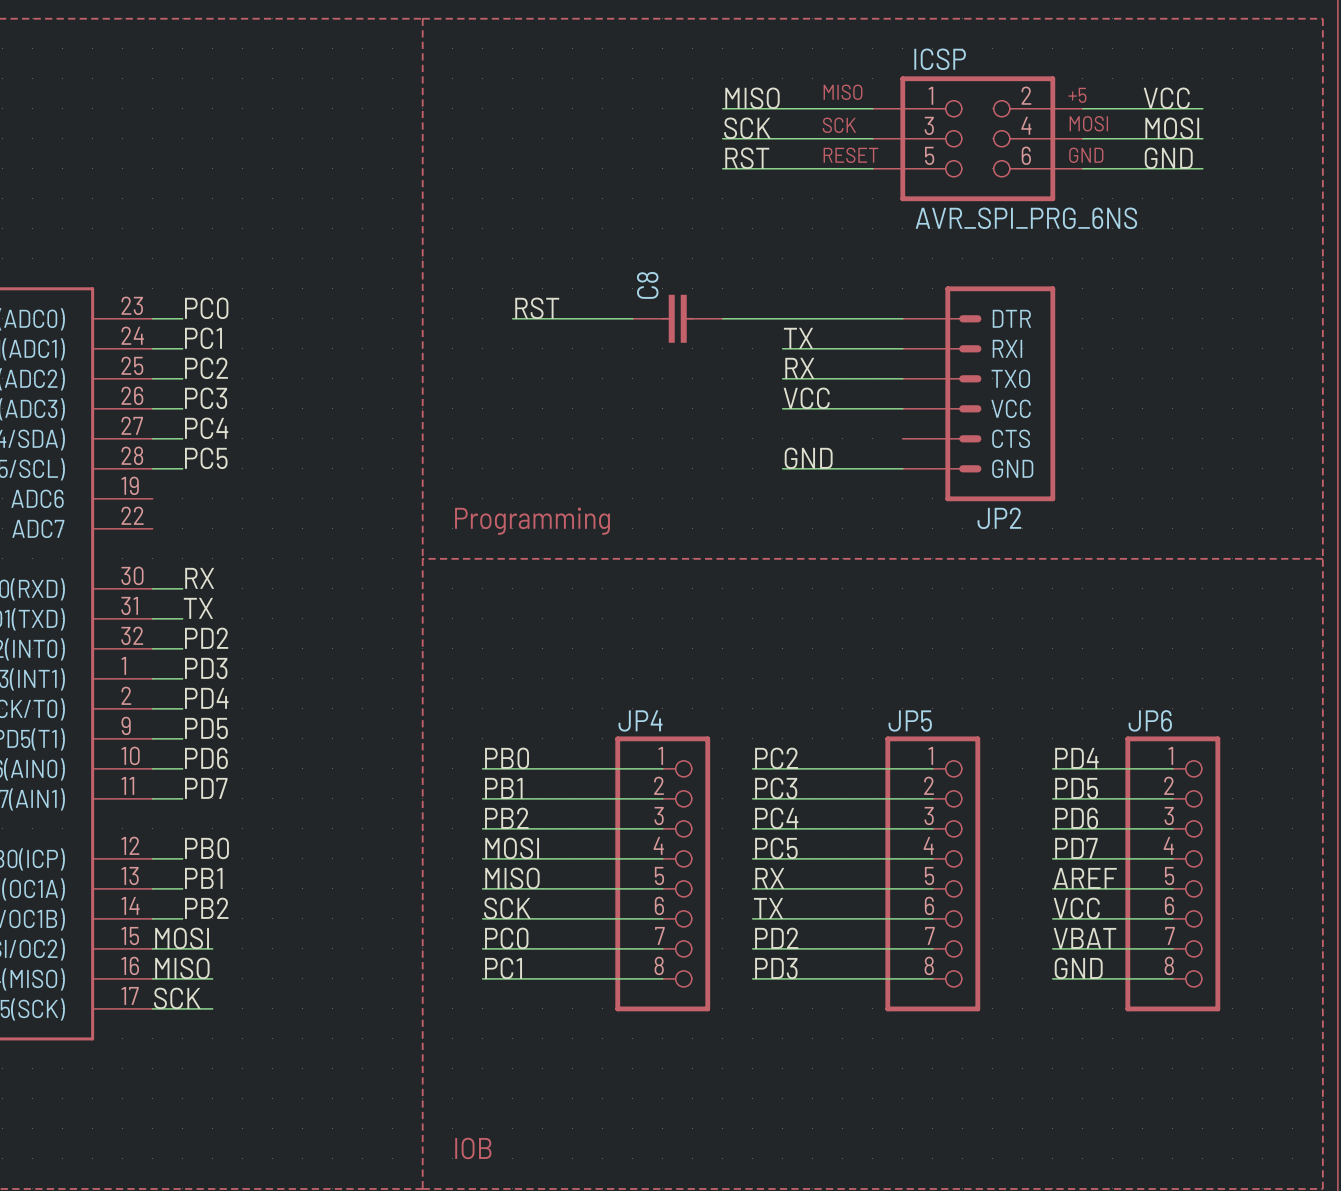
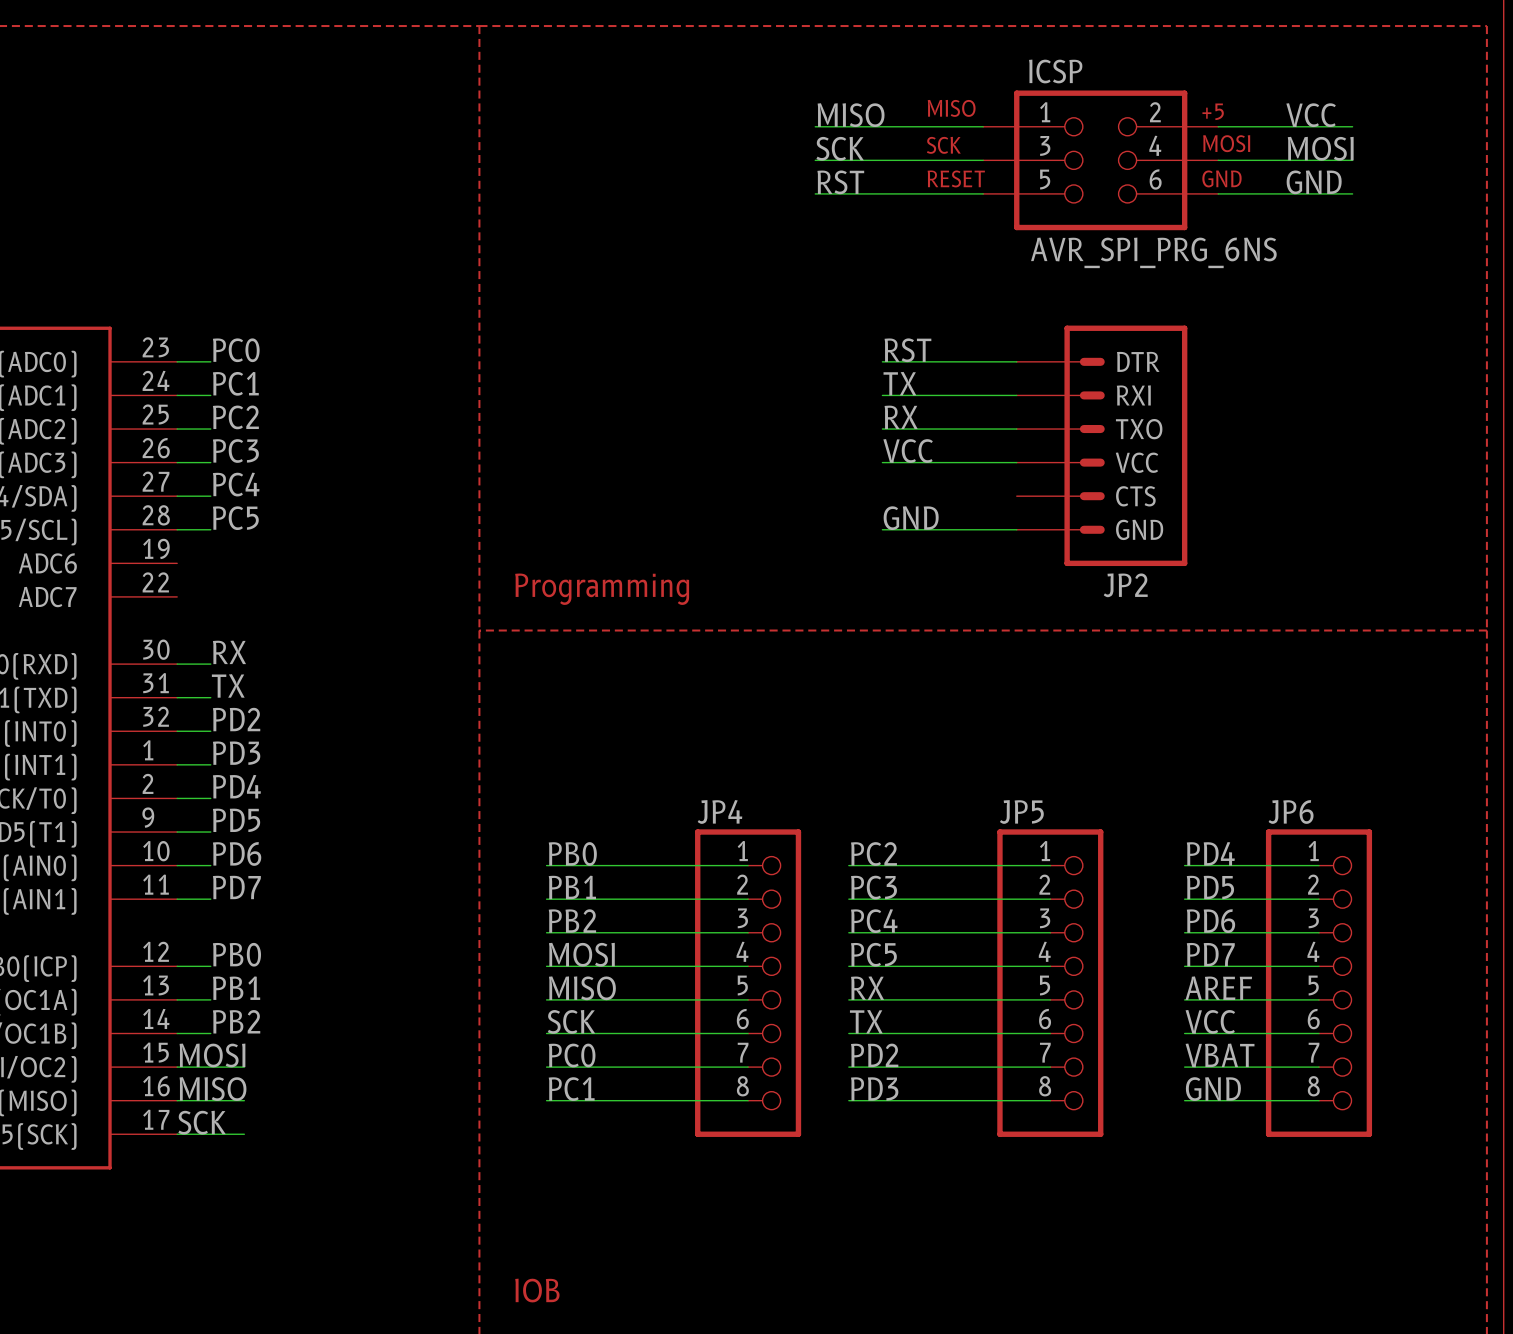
label position: RST (537, 308) -> RST (907, 350)
wire: (512, 318) (632, 318) -> none
C8: (677, 318) -> none
wire: (722, 318) (782, 318) -> none

